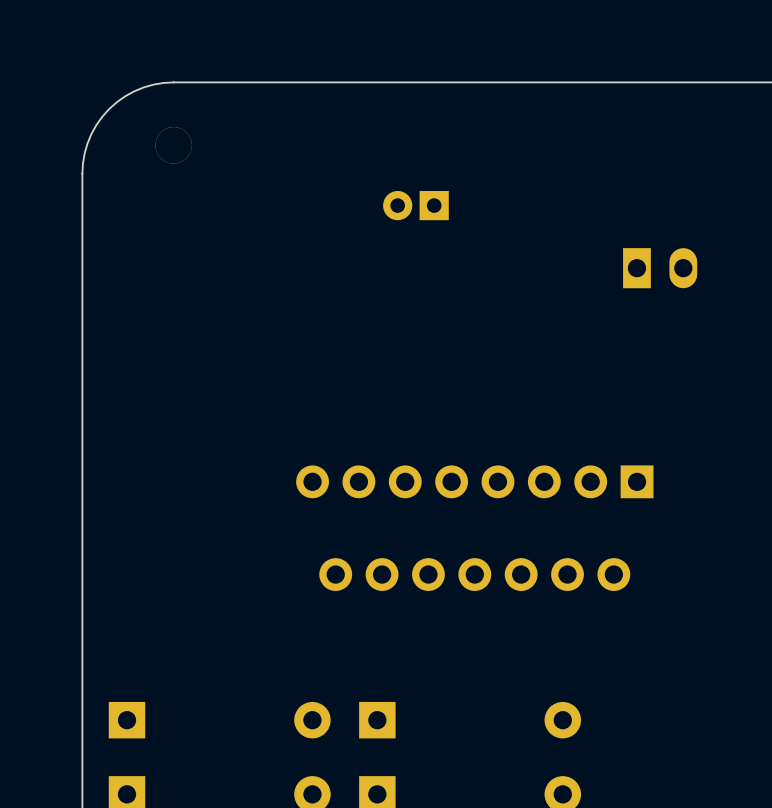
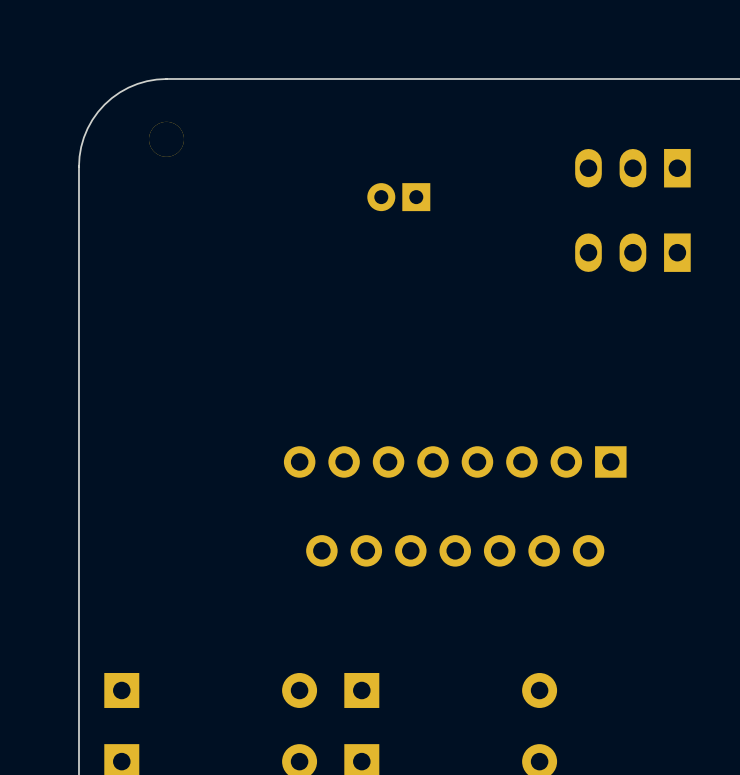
part: none -> (632, 168)
part footprint: [623, 248, 698, 289] -> [575, 233, 691, 272]

